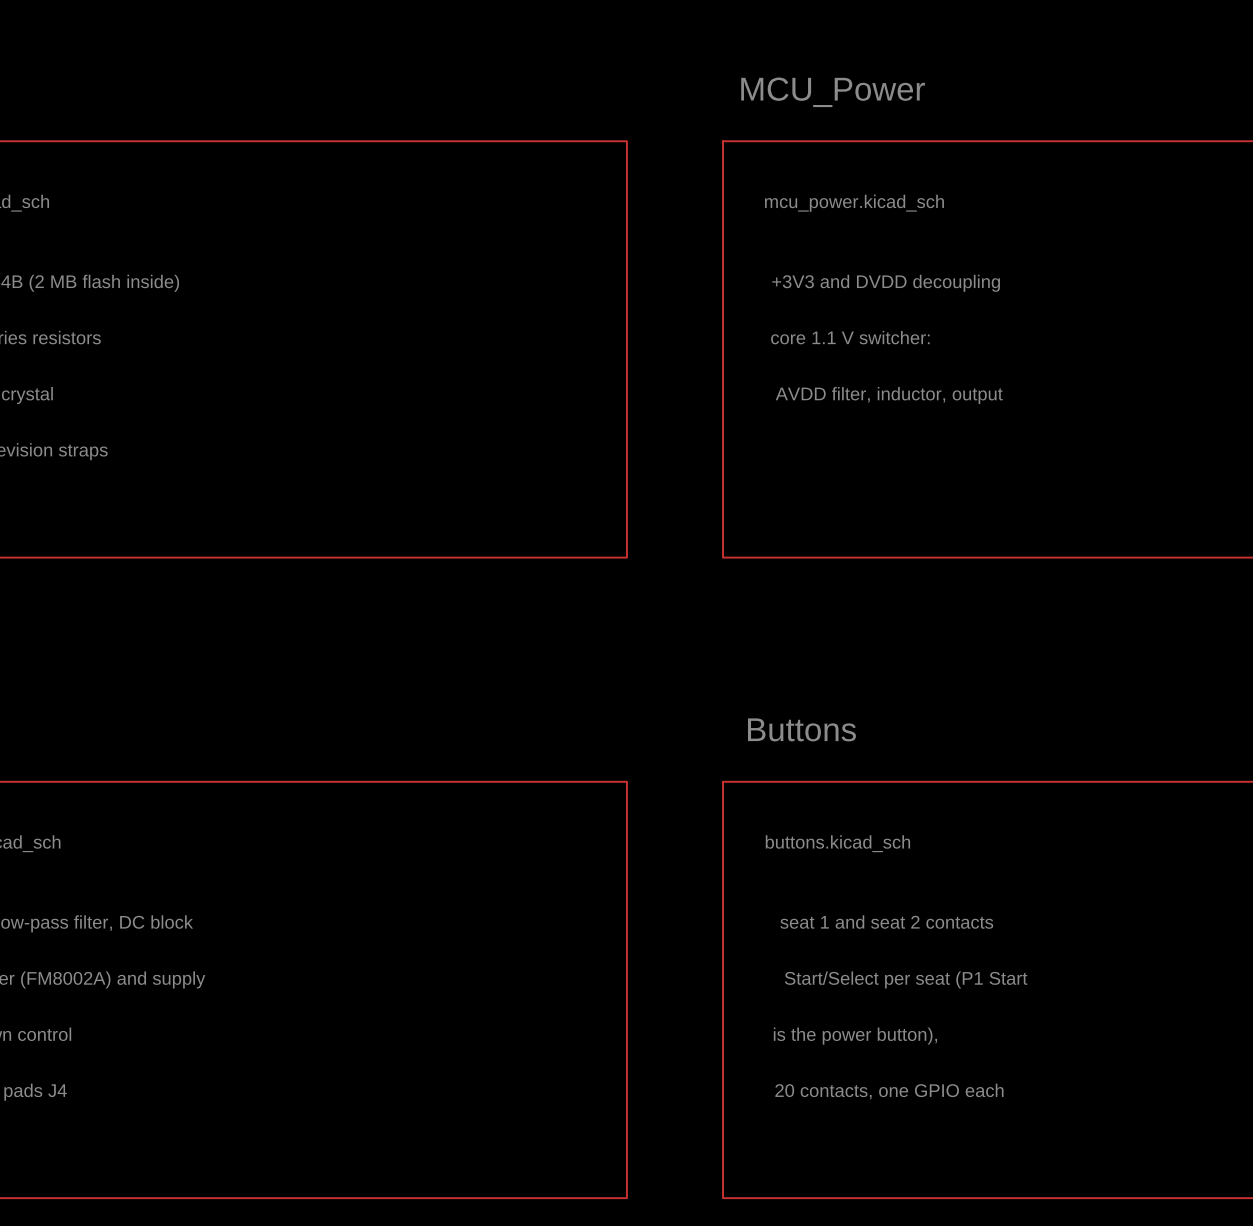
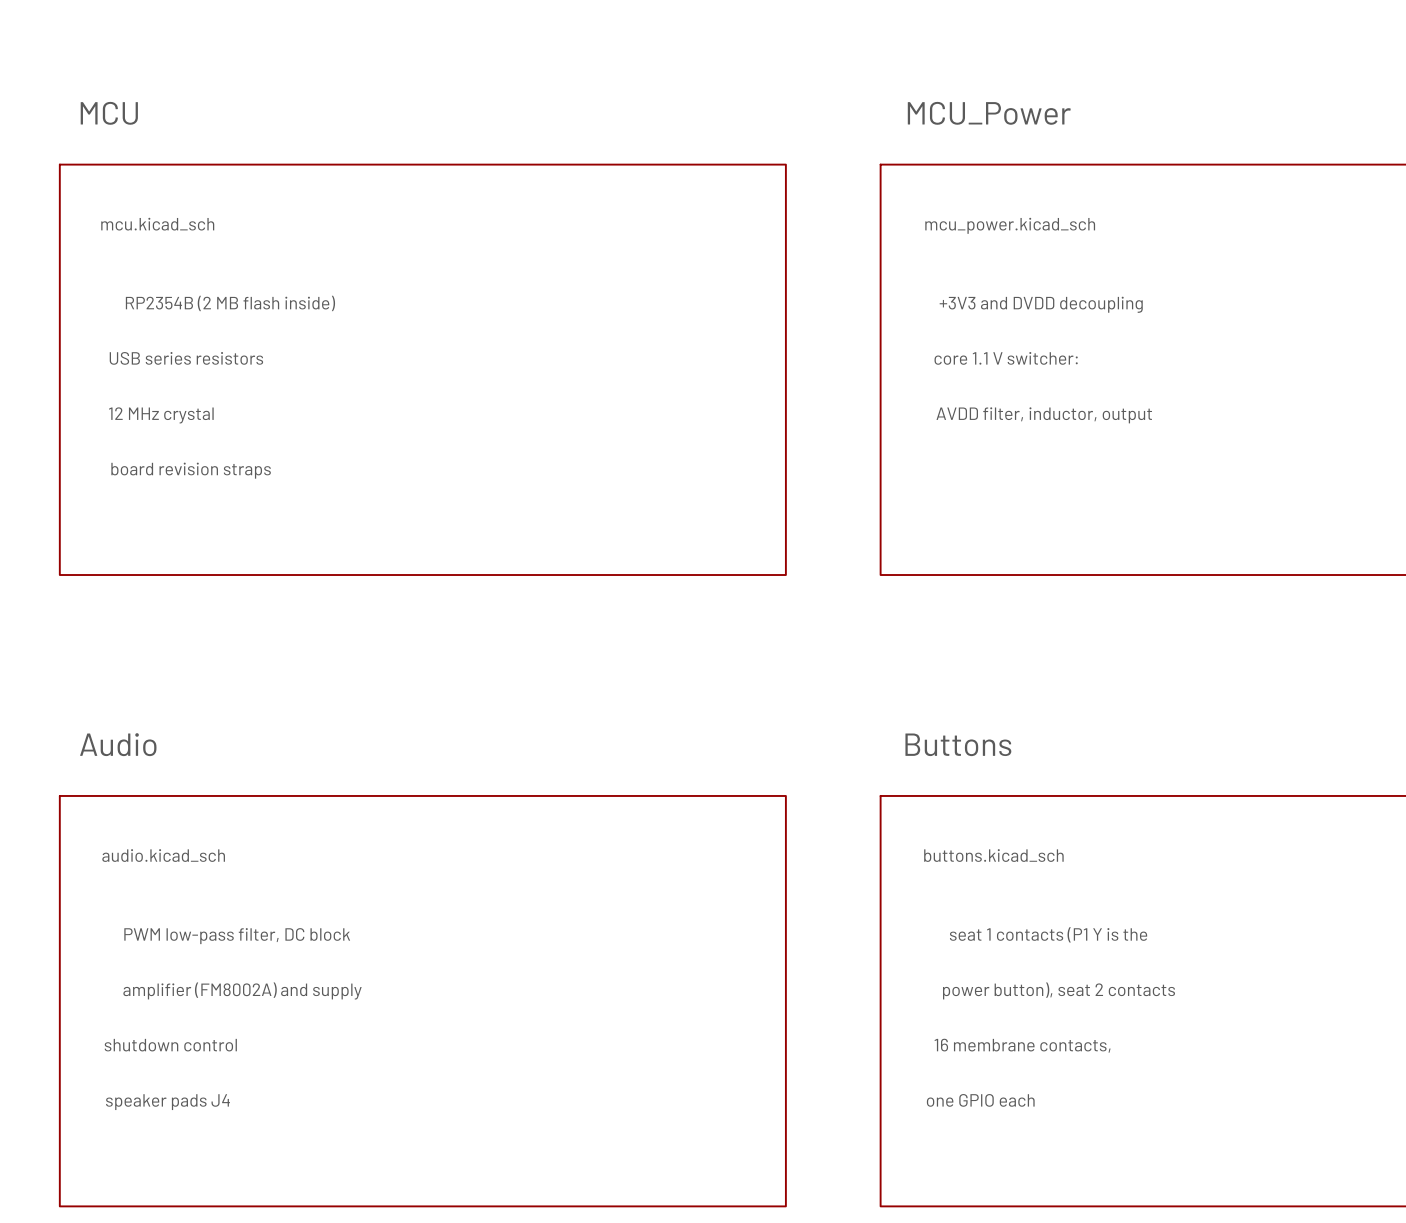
text: seat 1 and seat 2 contacts (886, 922) -> seat 1 contacts (P1 Y is the (1048, 934)
text: Start/Select per seat (P1 Start (906, 979) -> power button), seat 2 contacts (1059, 990)
text: is the power button), (855, 1036) -> 16 membrane contacts, (1022, 1045)
text: 20 contacts, one GPIO each (889, 1091) -> one GPIO each (980, 1100)

